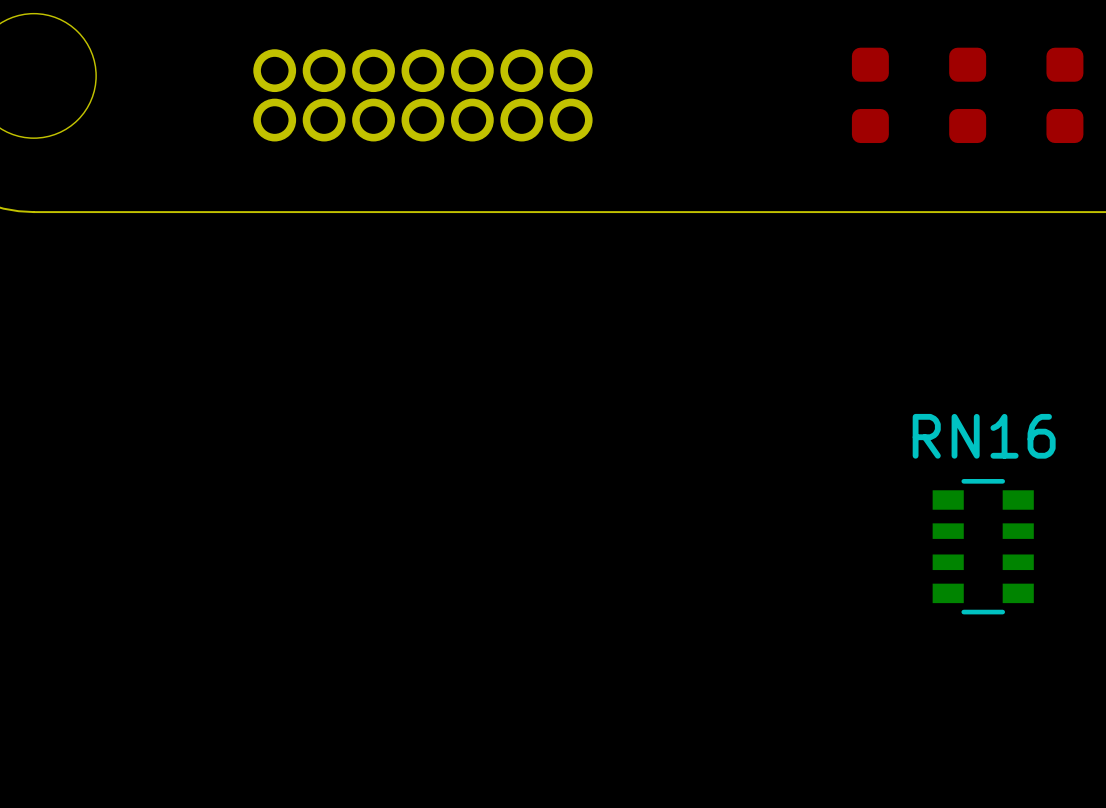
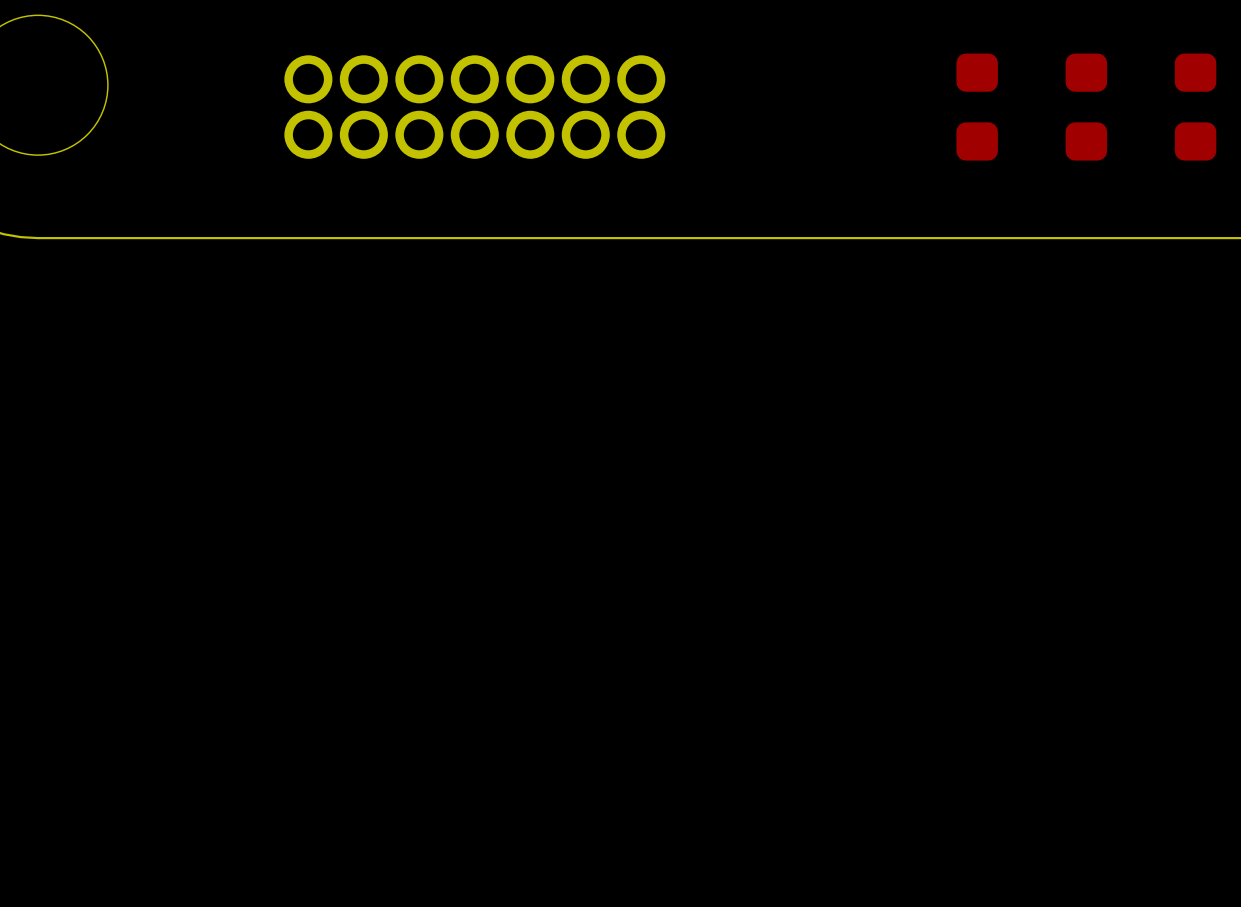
RN16: (983, 546) -> none

